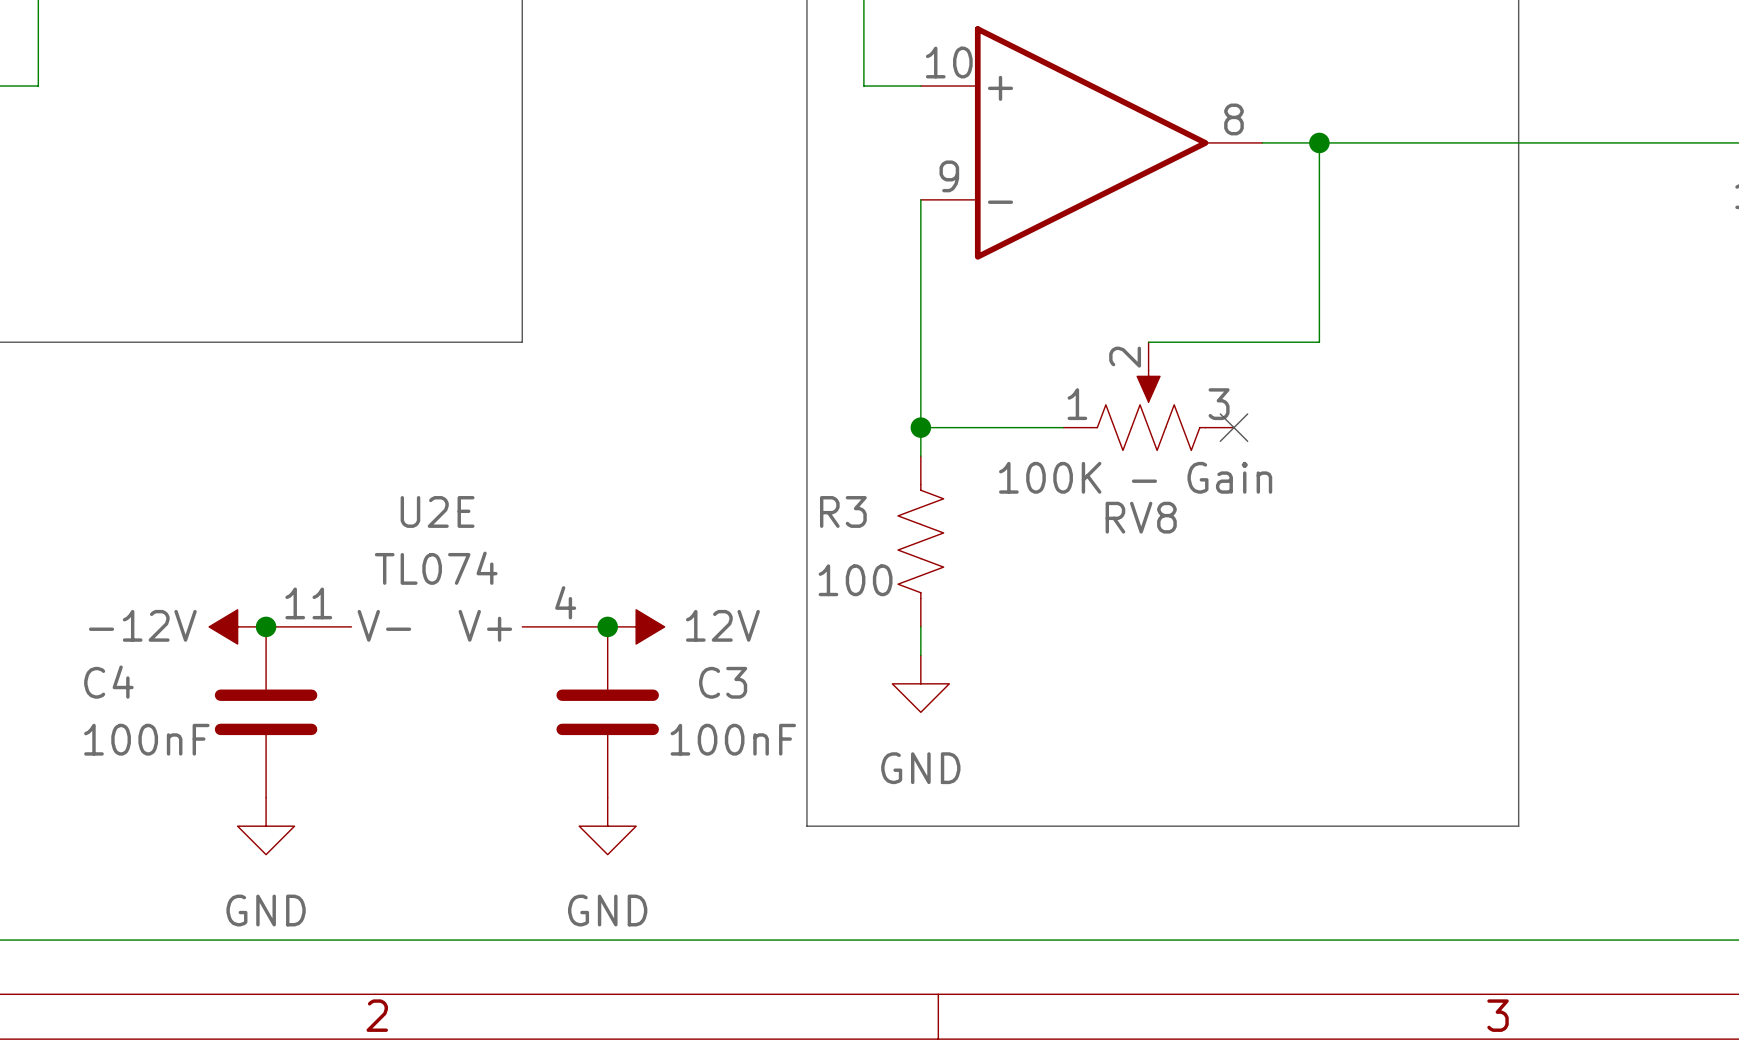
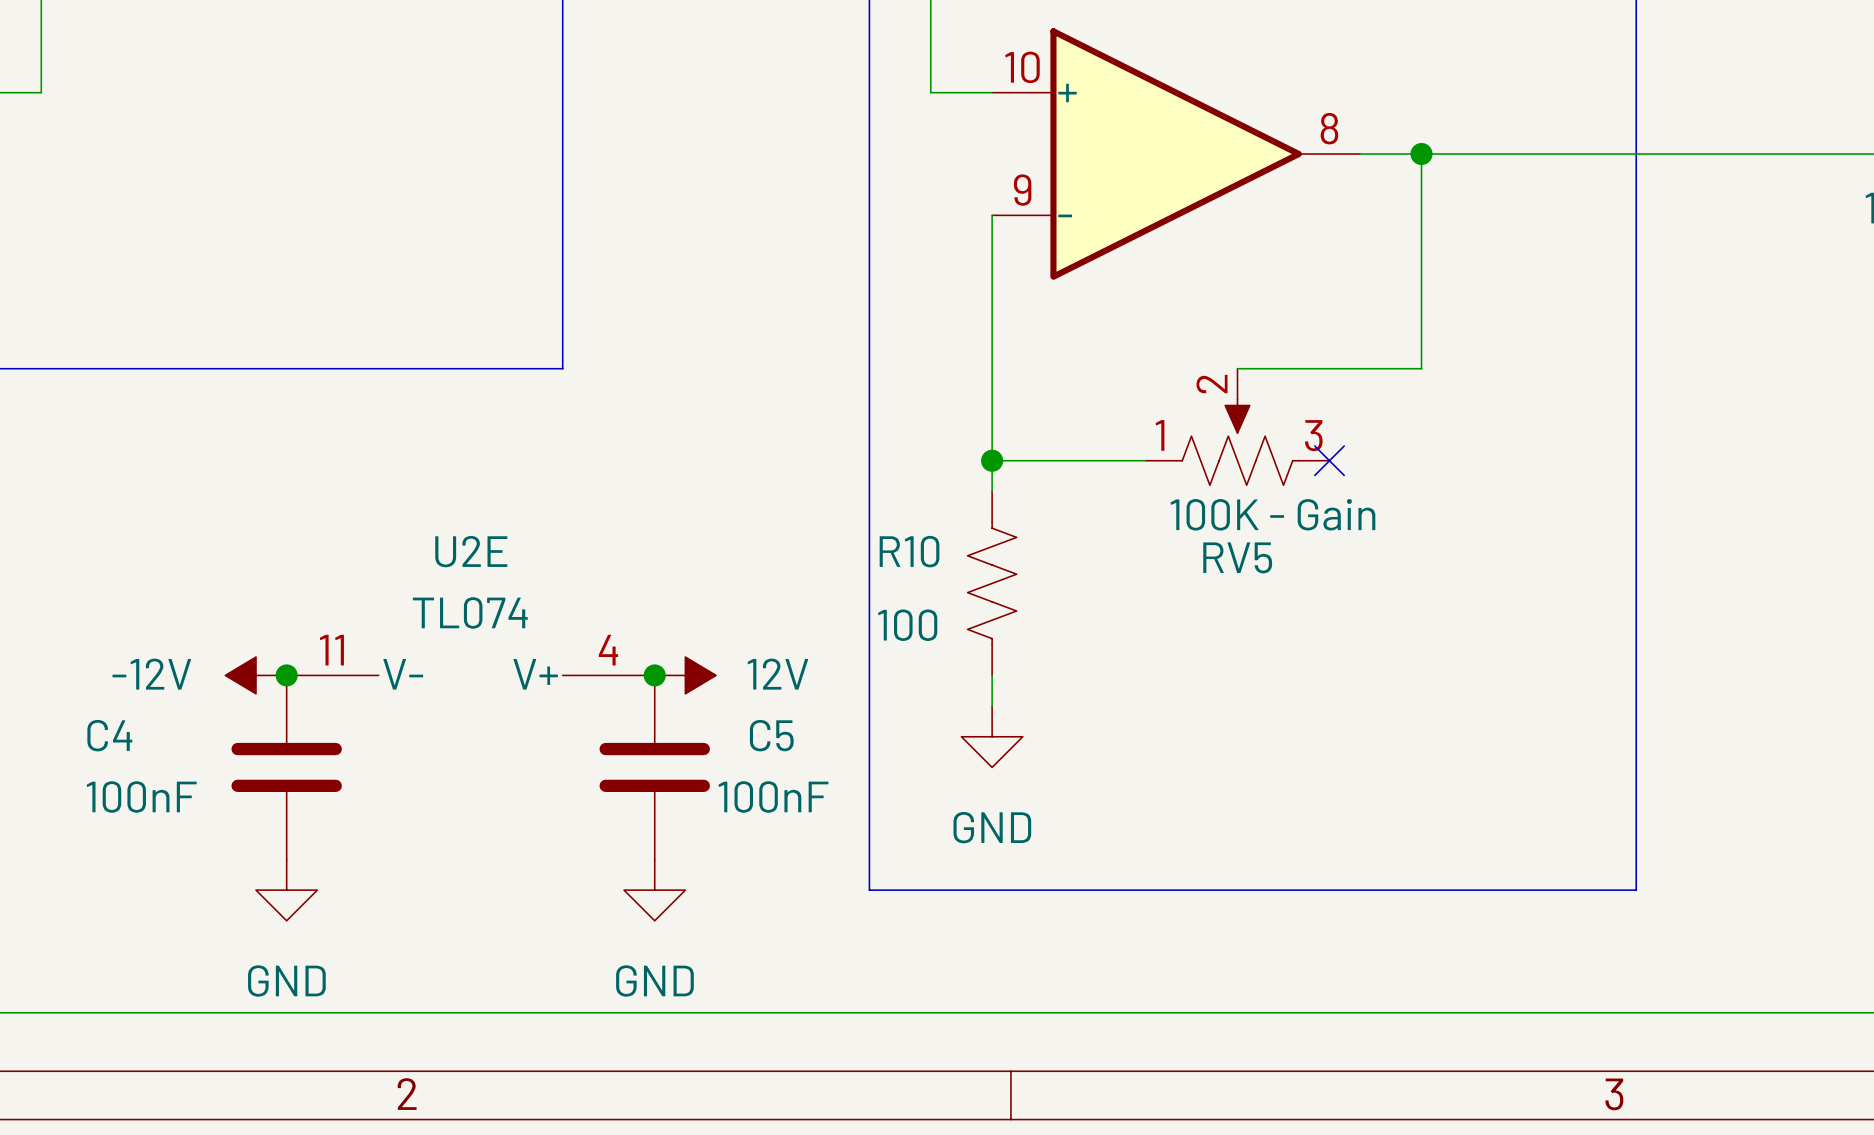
R3 name: R3 (843, 511) -> R10 (909, 551)
RV8 name: RV8 (1141, 517) -> RV5 (1237, 557)
C3 name: C3 (723, 682) -> C5 (771, 735)

